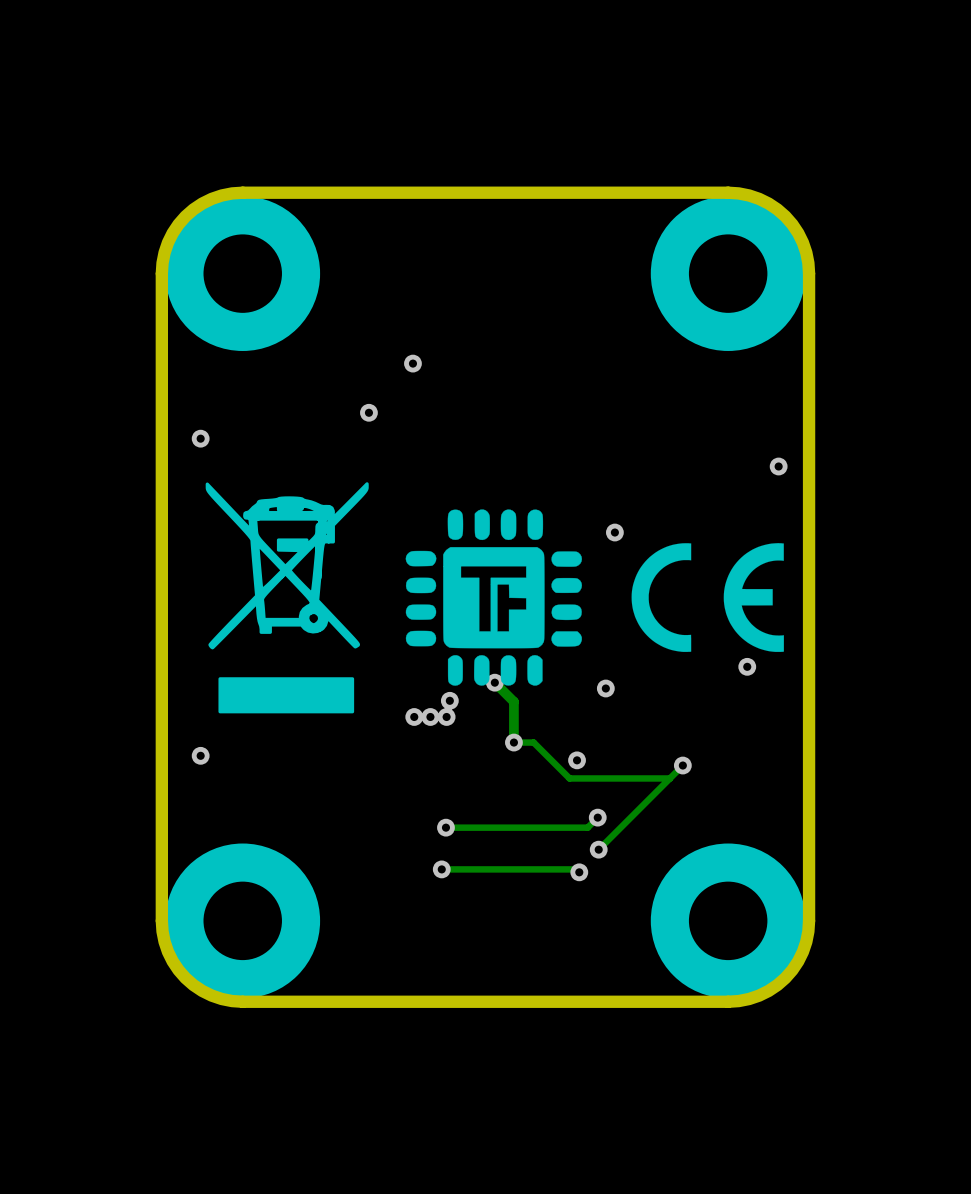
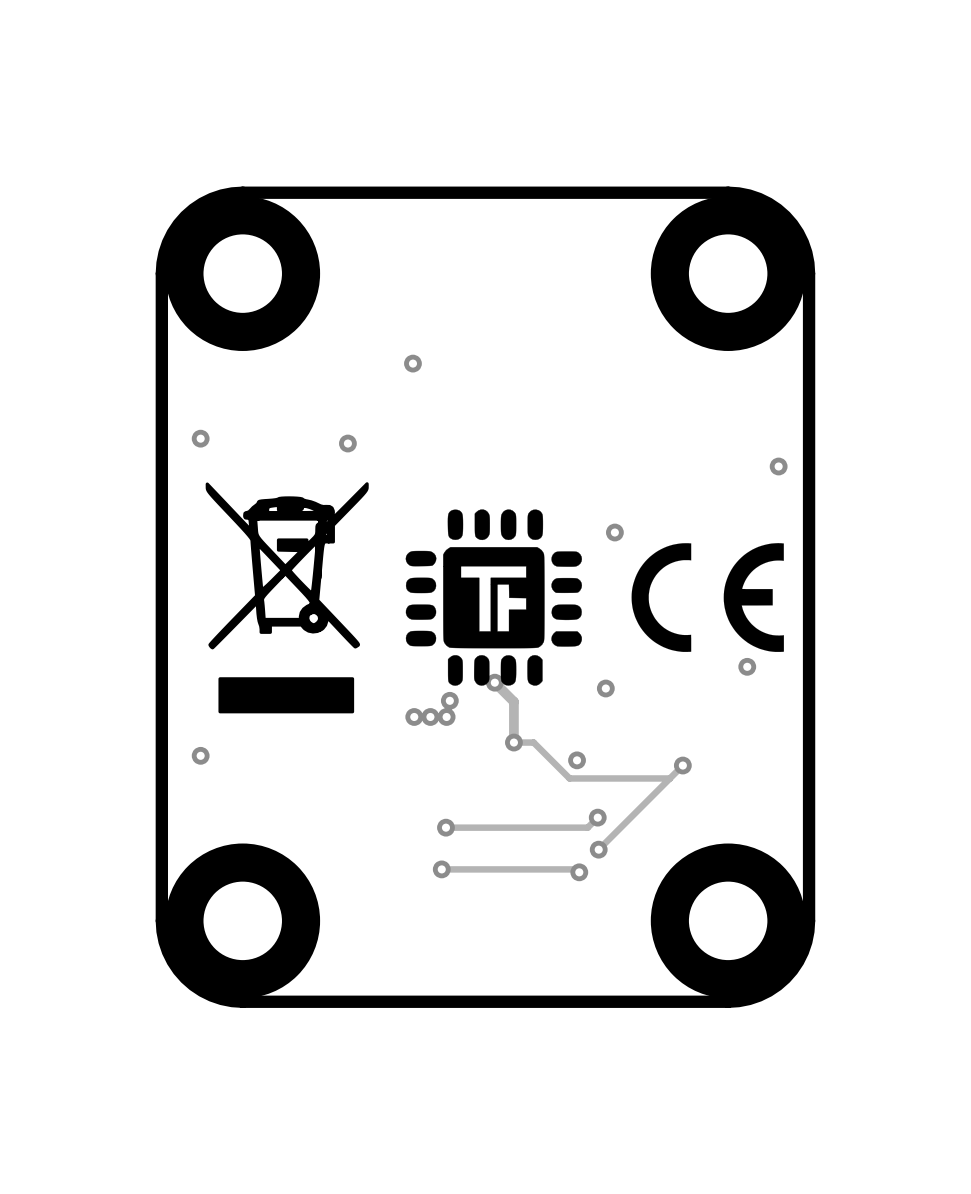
via position: (368, 412) -> (347, 443)

